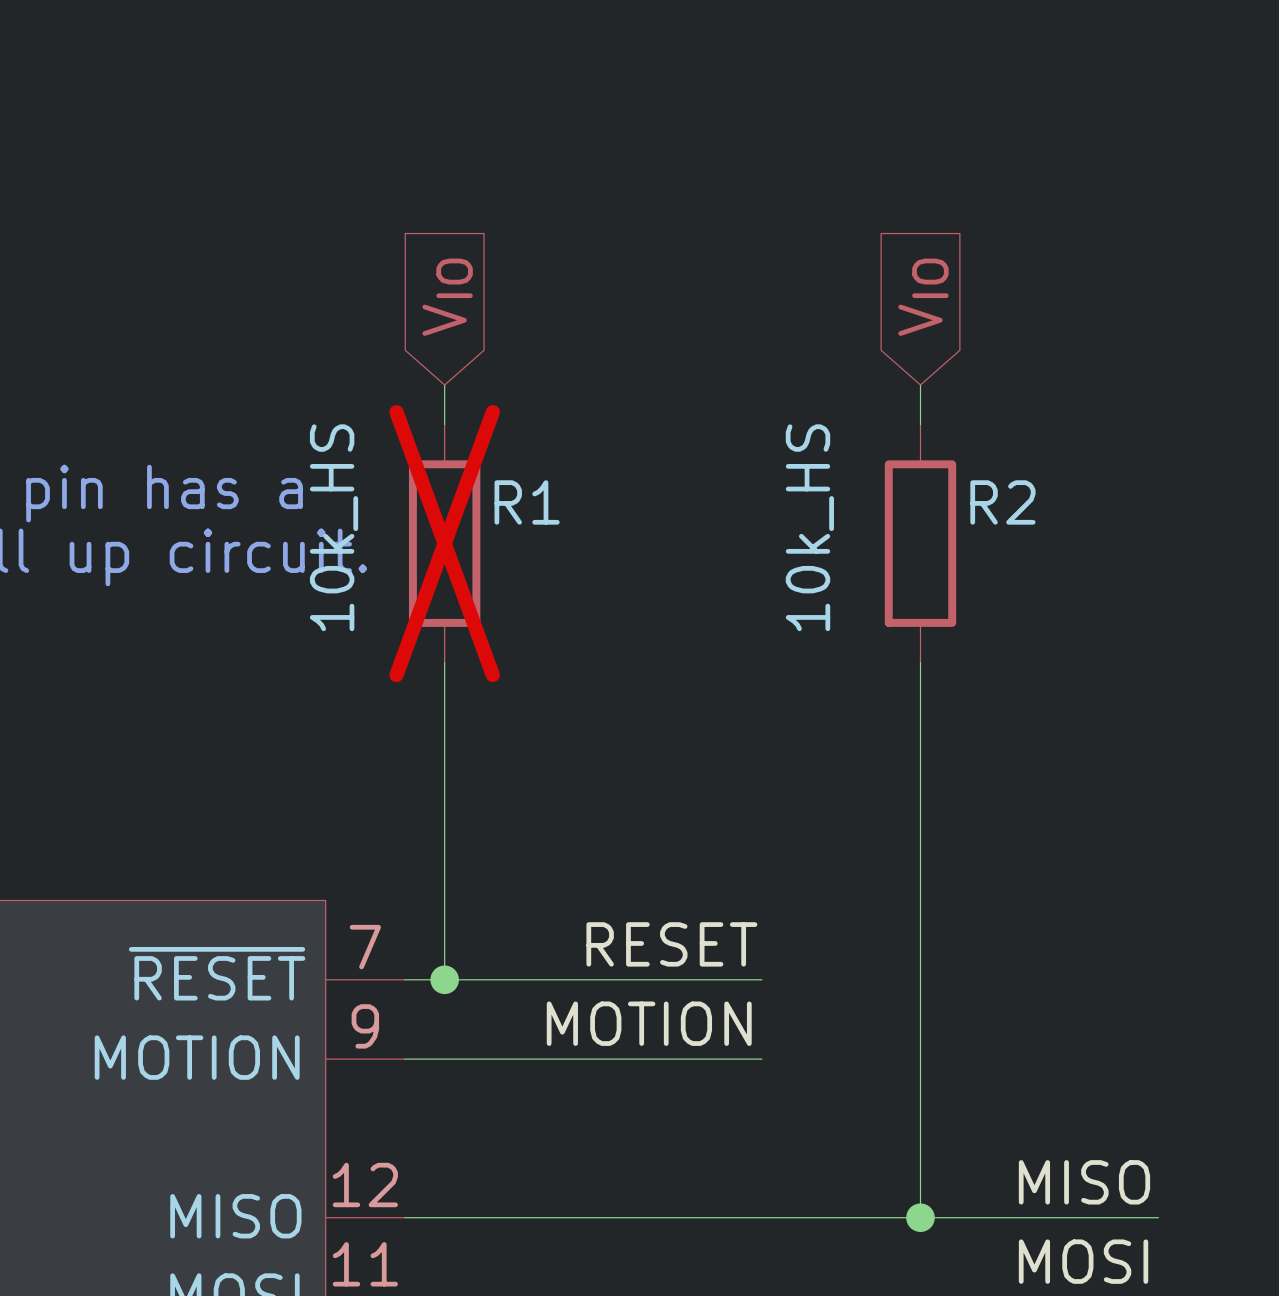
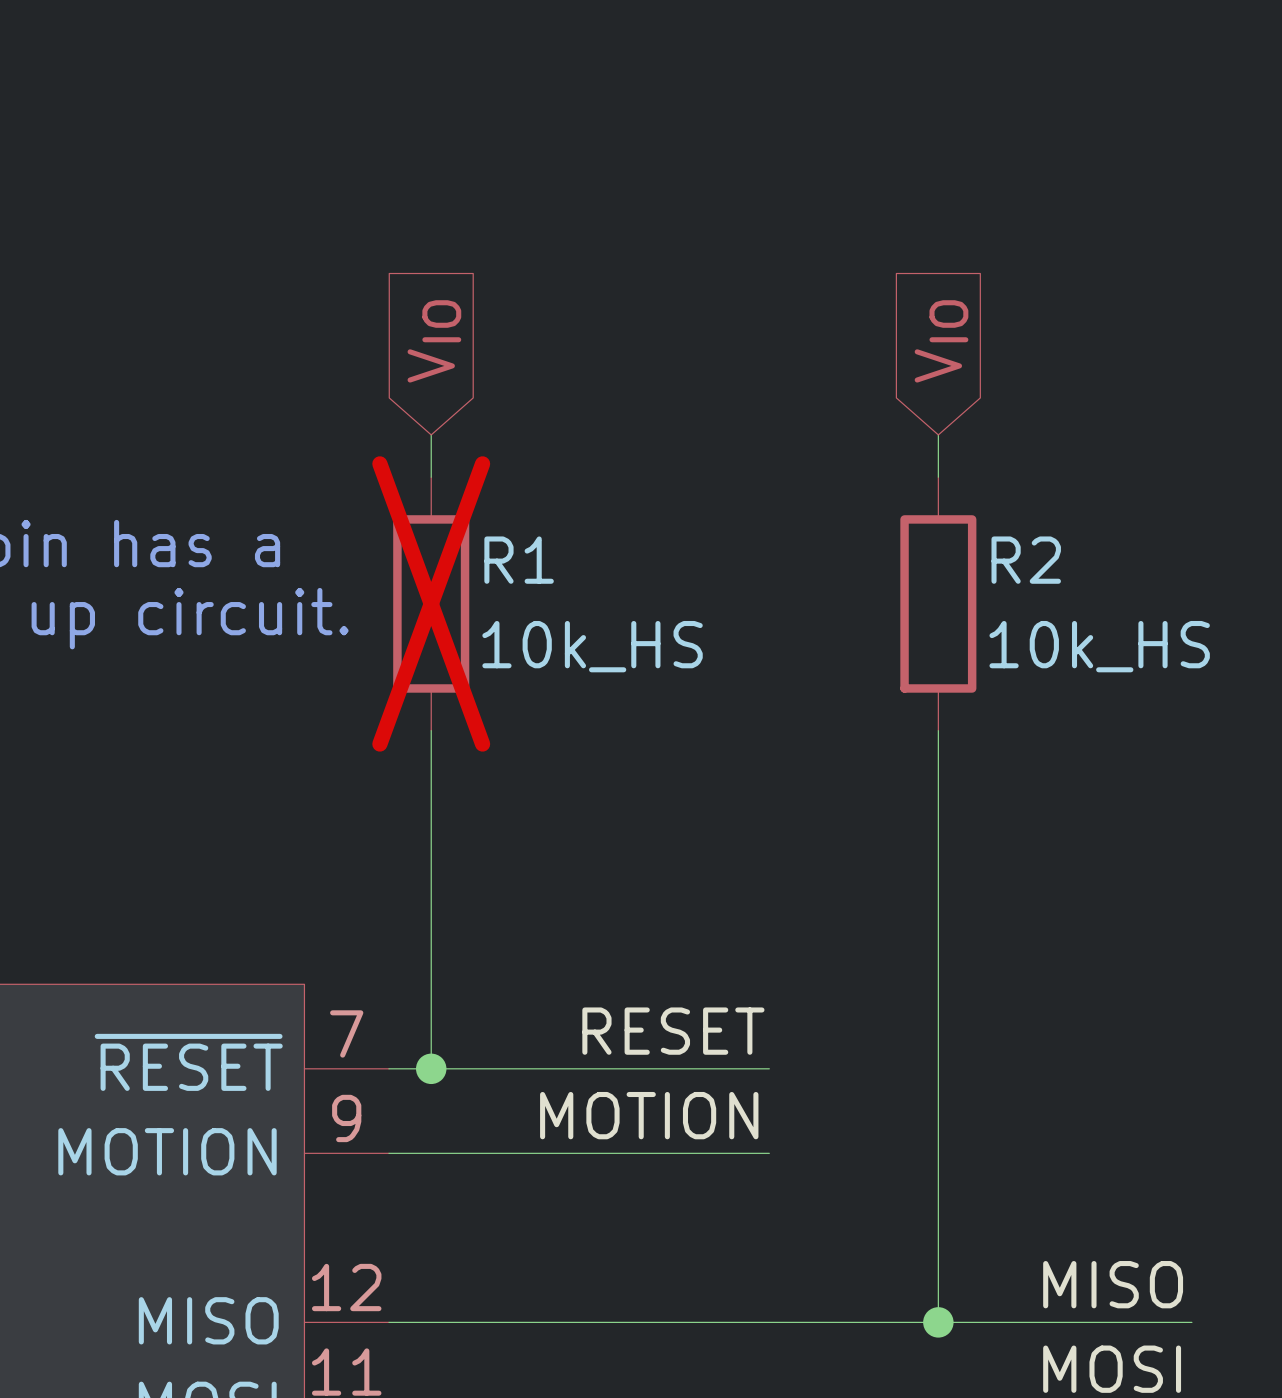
R1 value rotation: 0° (334, 527) -> 90° clockwise (592, 646)
R1 value position: 10k_HS (334, 527) -> 10k_HS (592, 646)
R2 value rotation: 0° (809, 527) -> 90° clockwise (1099, 646)
R2 value position: 10k_HS (809, 527) -> 10k_HS (1099, 646)

